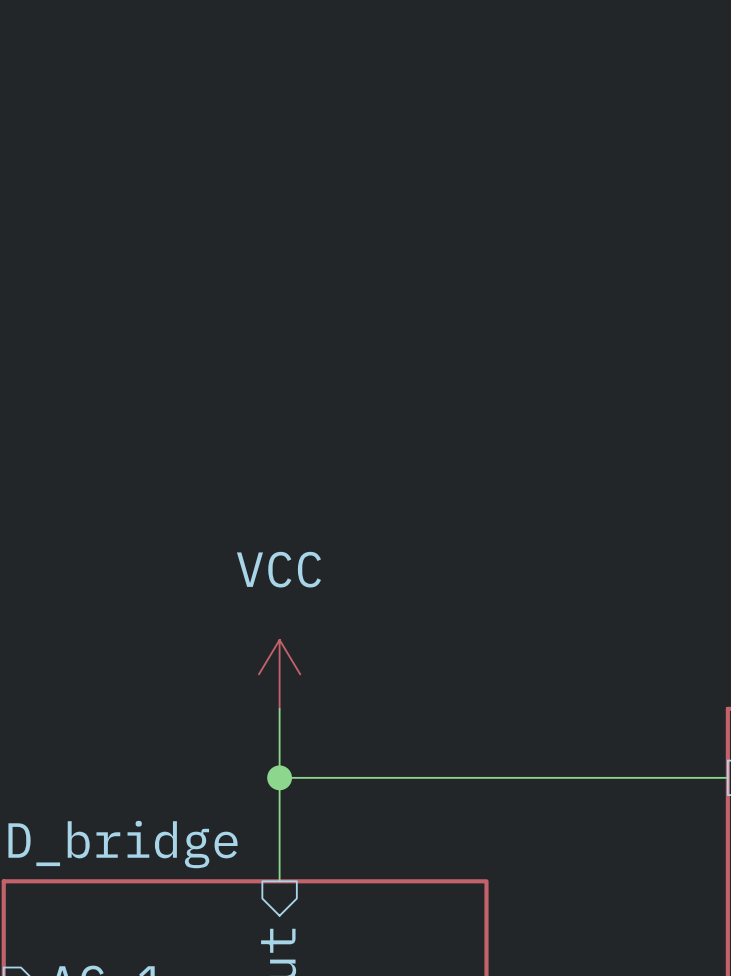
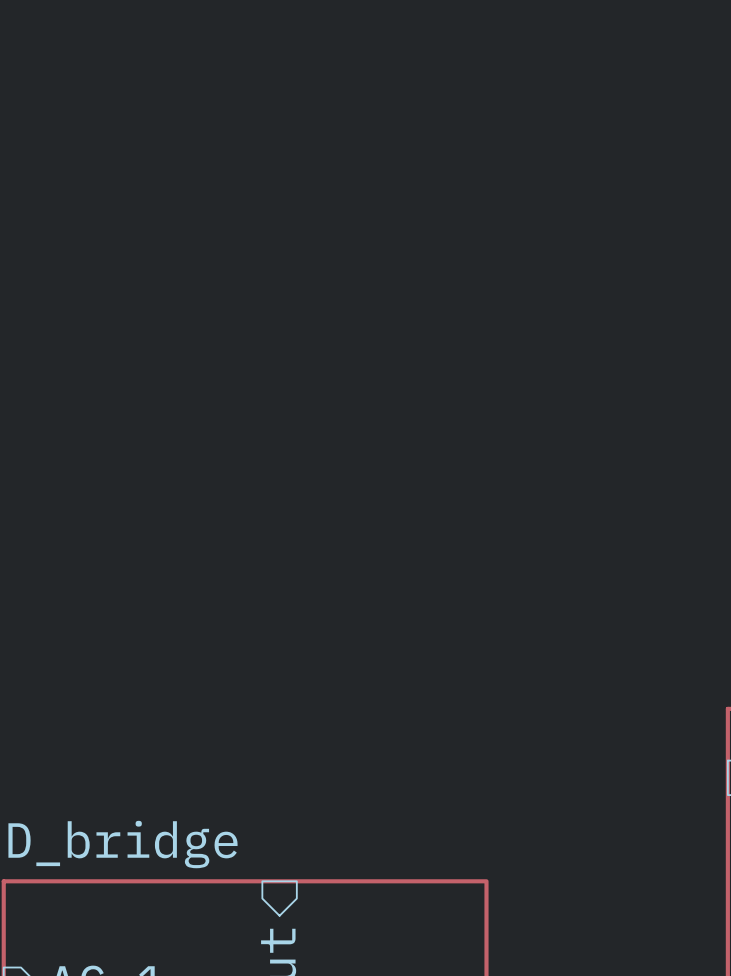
power symbol: VCC (279, 674) -> none
wire: (279, 708) (279, 881) -> none
wire: (279, 777) (727, 777) -> none
junction: (279, 777) -> none

